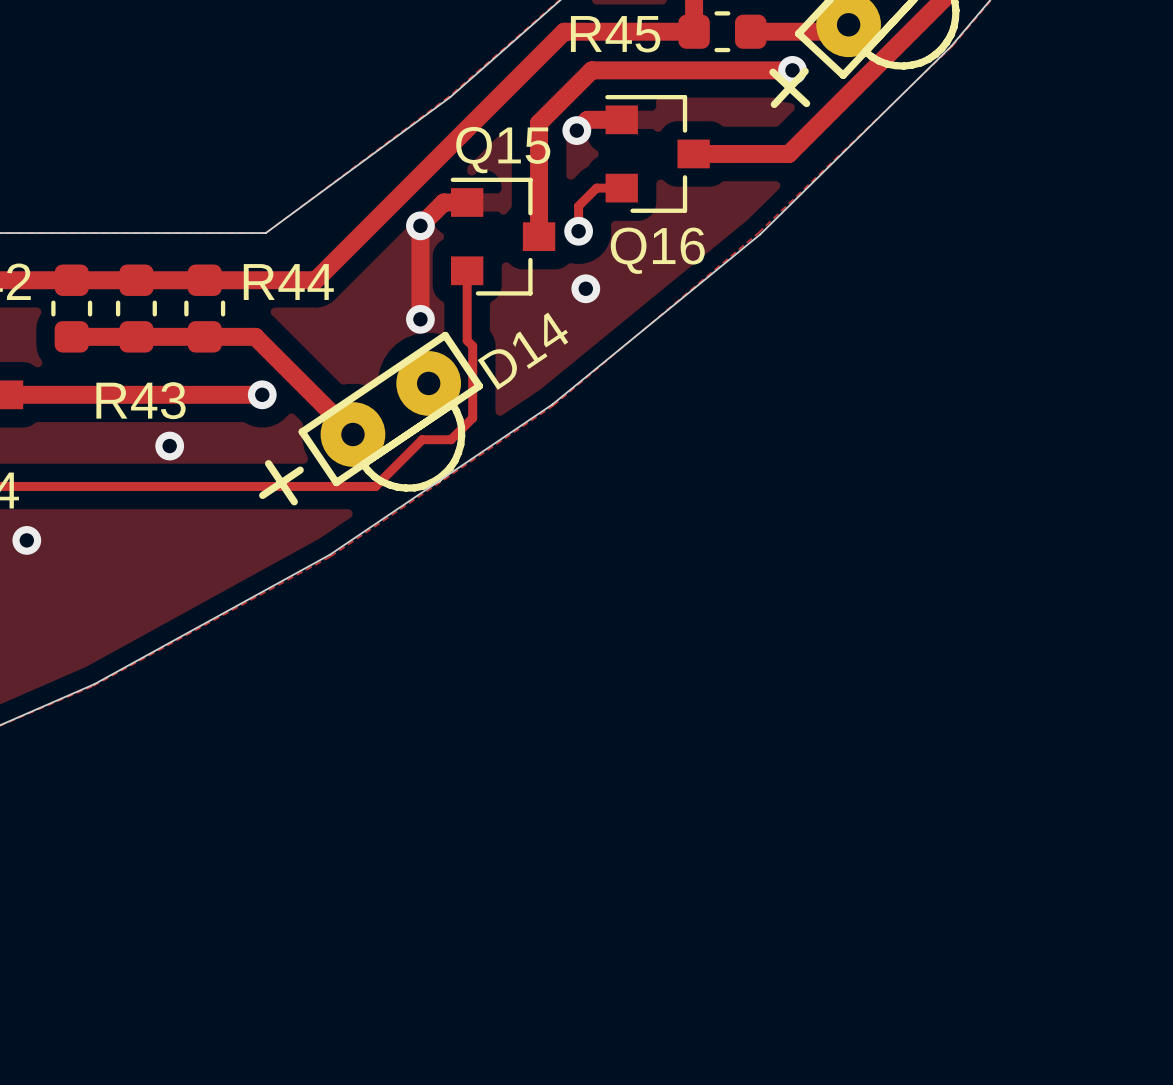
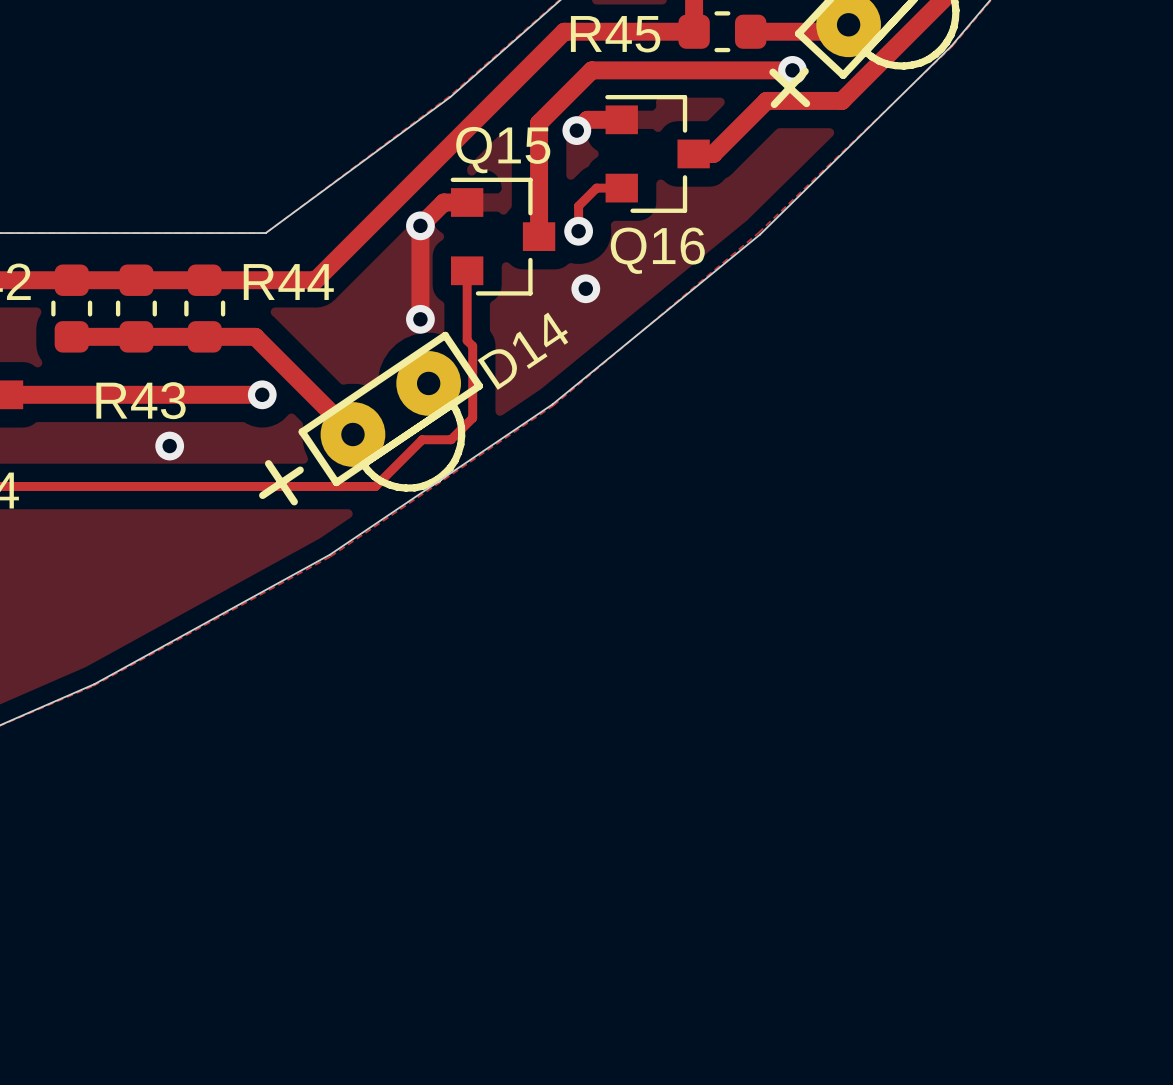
track: (841, 100) (788, 153) (713, 153) -> (841, 100) (766, 100) (713, 153)
via: (26, 540) -> none

